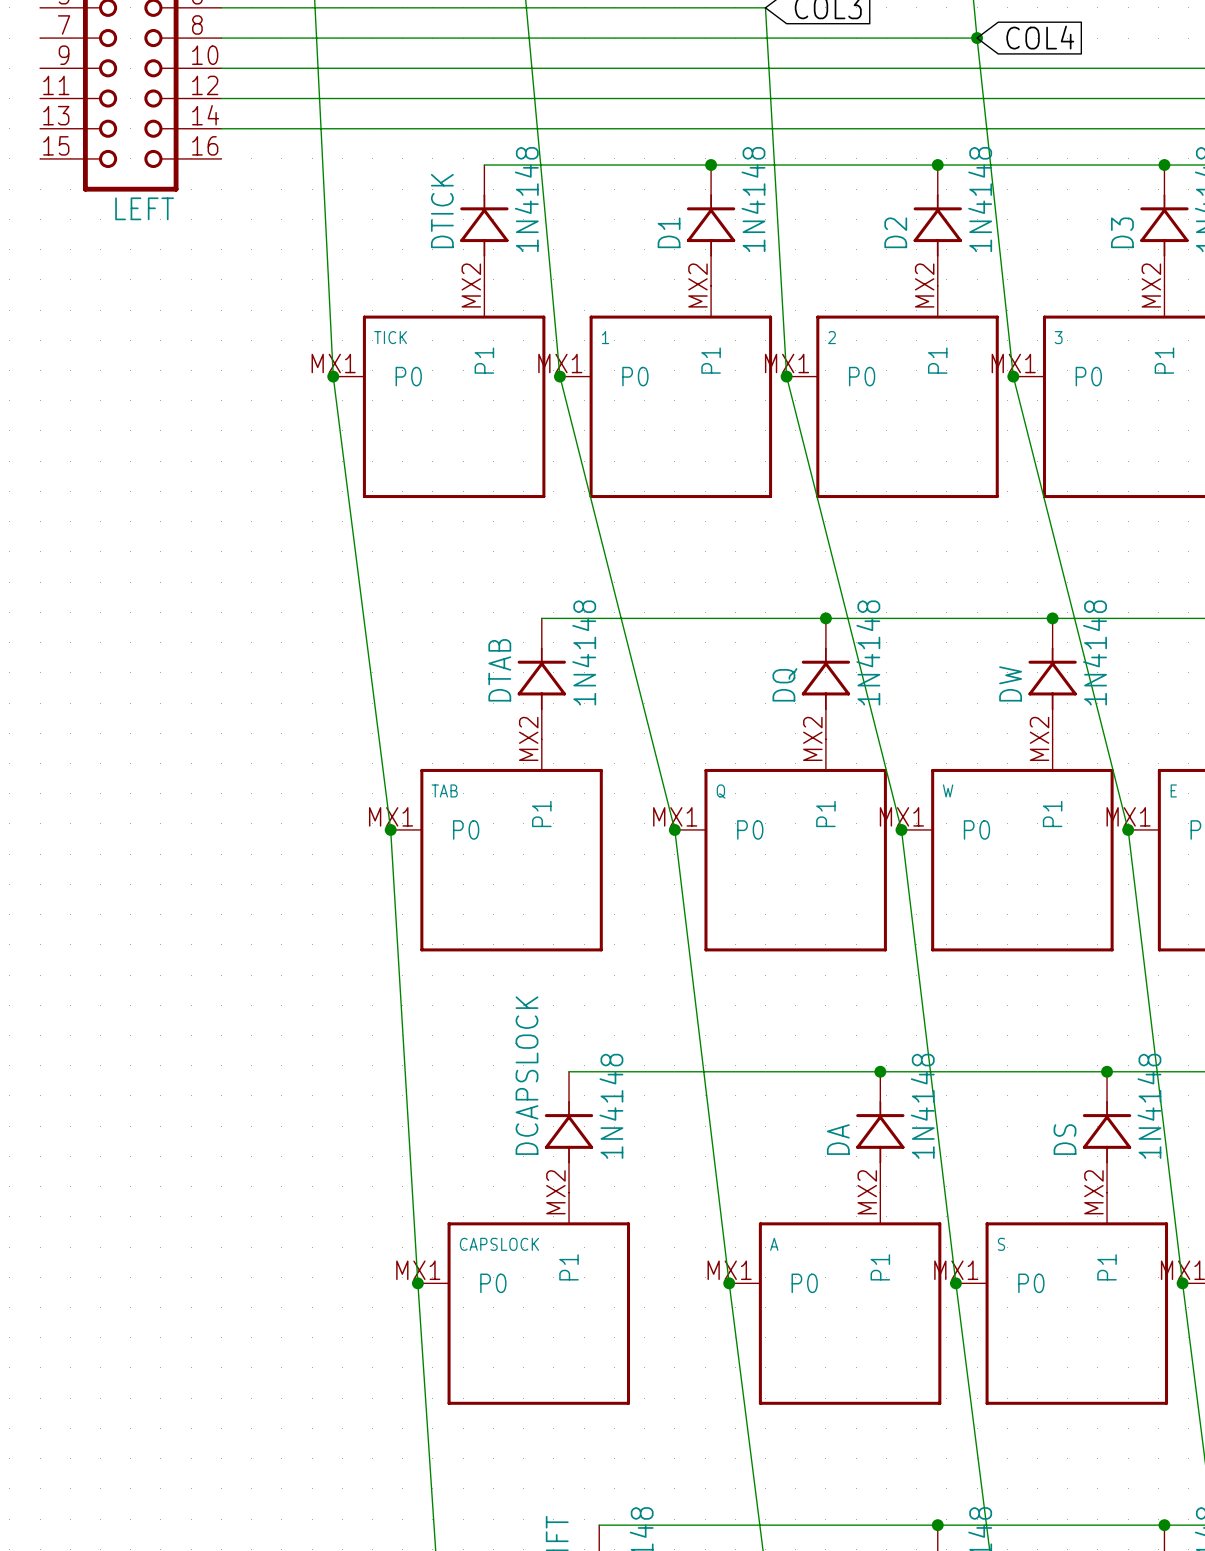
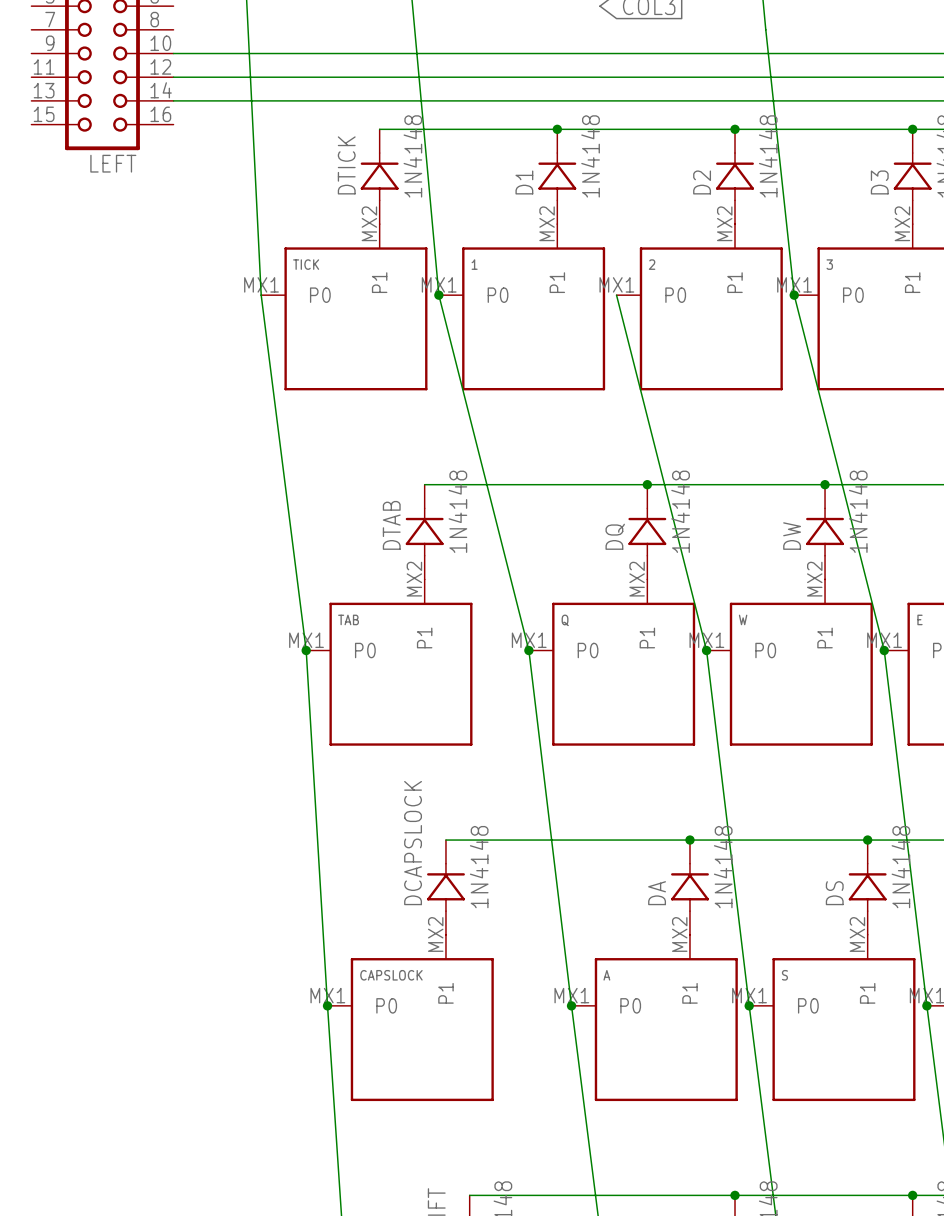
wire: (221, 7) (765, 7) (786, 376) -> none
global label: COL4 (1040, 37) -> none
wire: (221, 38) (977, 38) -> none
junction: (977, 38) -> none
junction: (333, 376) -> none
junction: (786, 376) -> none

